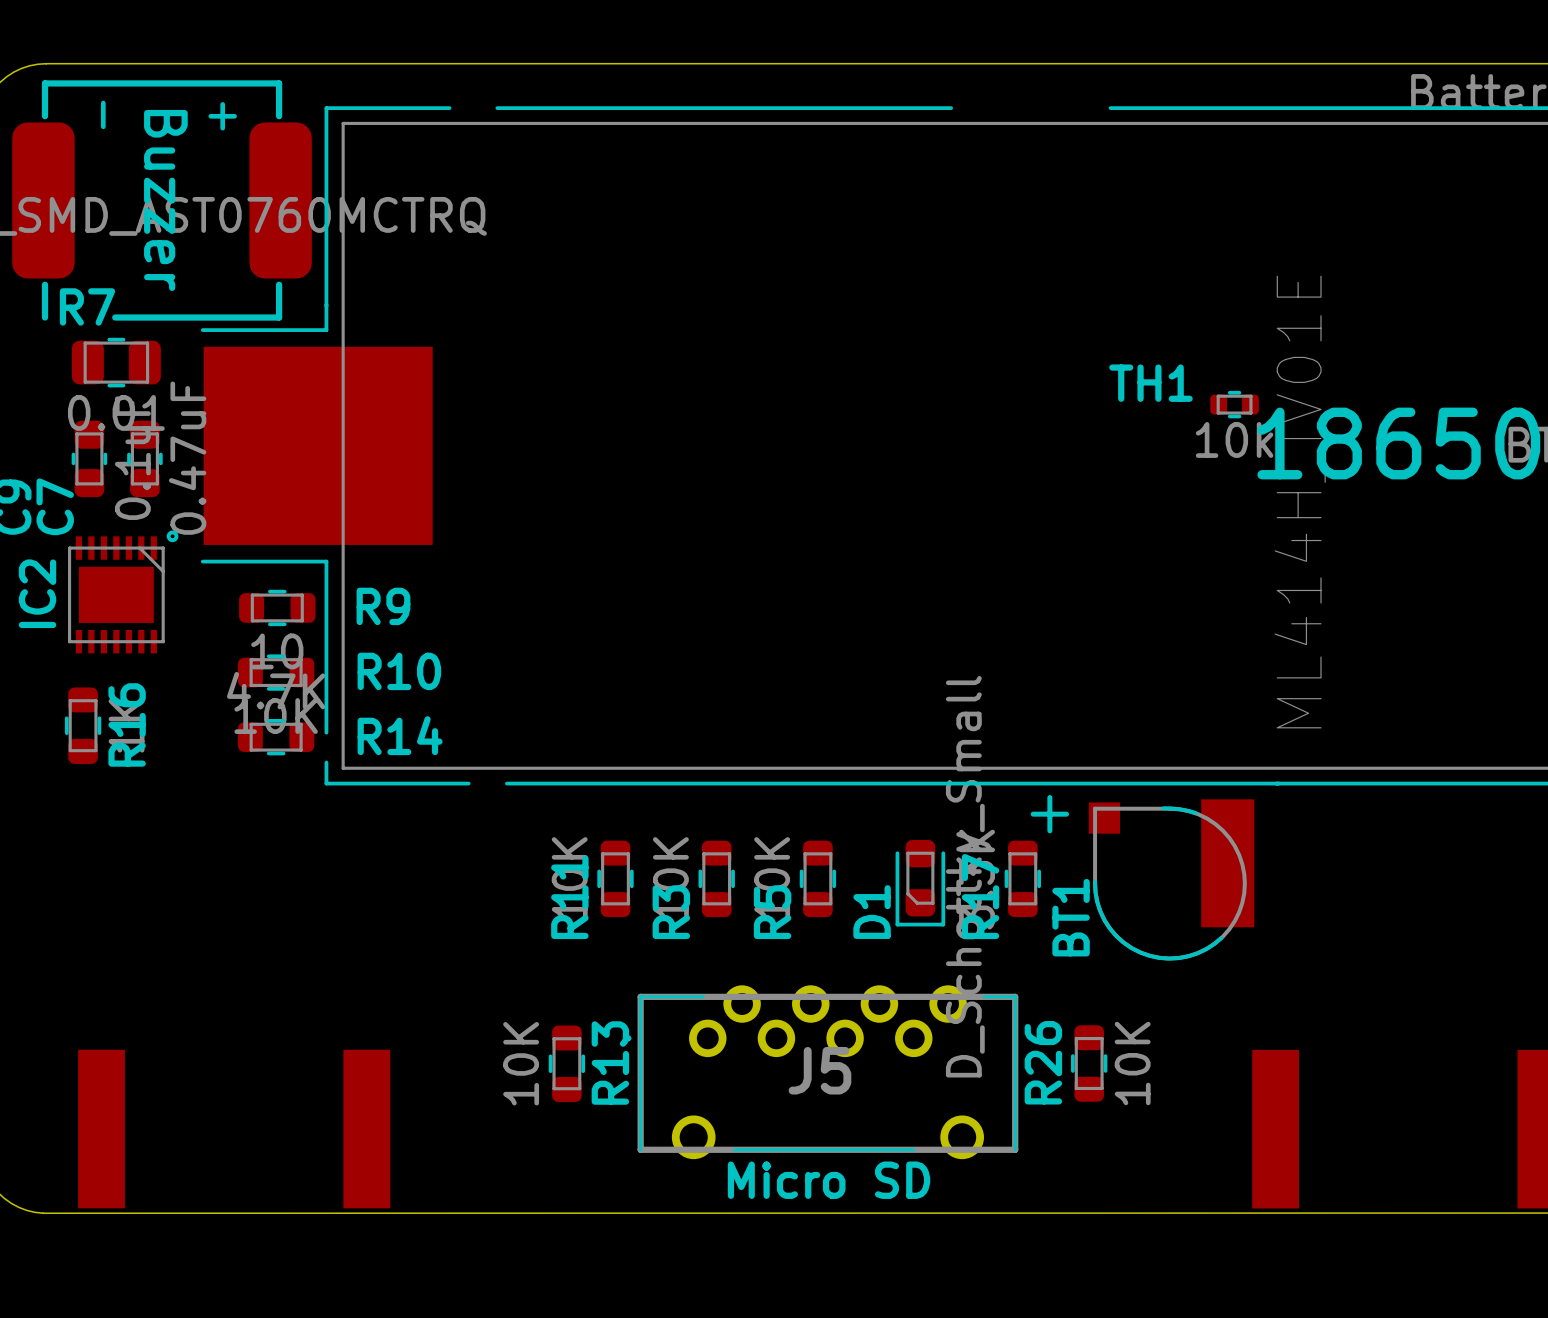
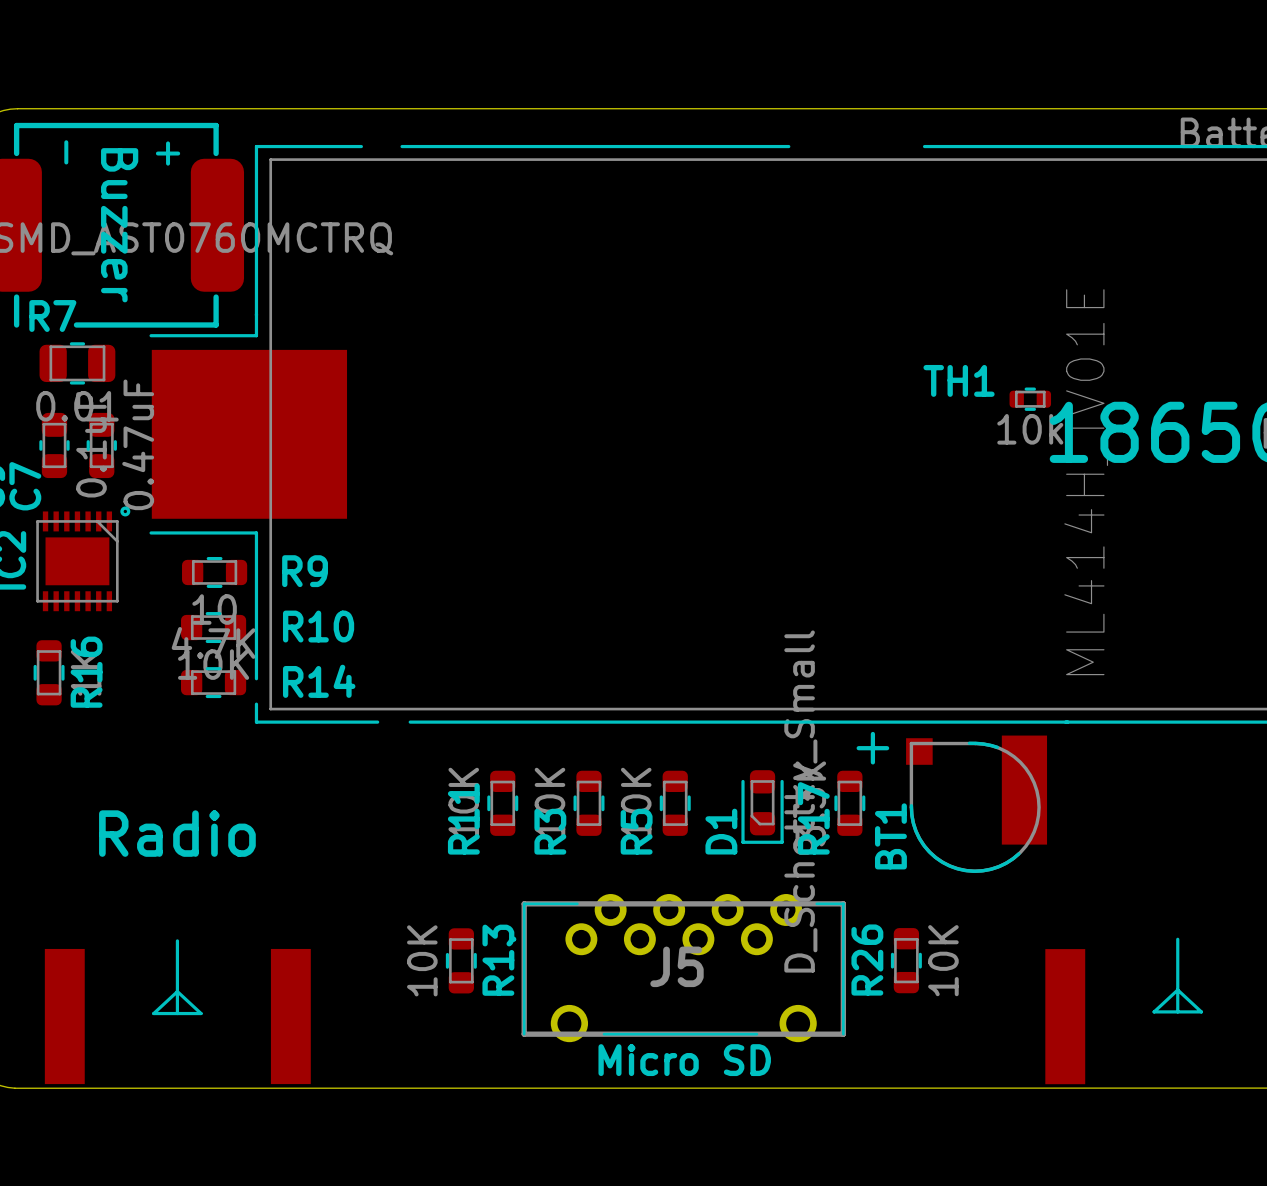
text: none -> Radio (177, 833)
line: none -> (1177, 939) (1177, 1011)
line: none -> (177, 940) (177, 1013)
line: none -> (1177, 989) (1154, 1011) (1201, 1011) (1177, 989)
line: none -> (177, 991) (153, 1013) (201, 1013) (177, 991)

